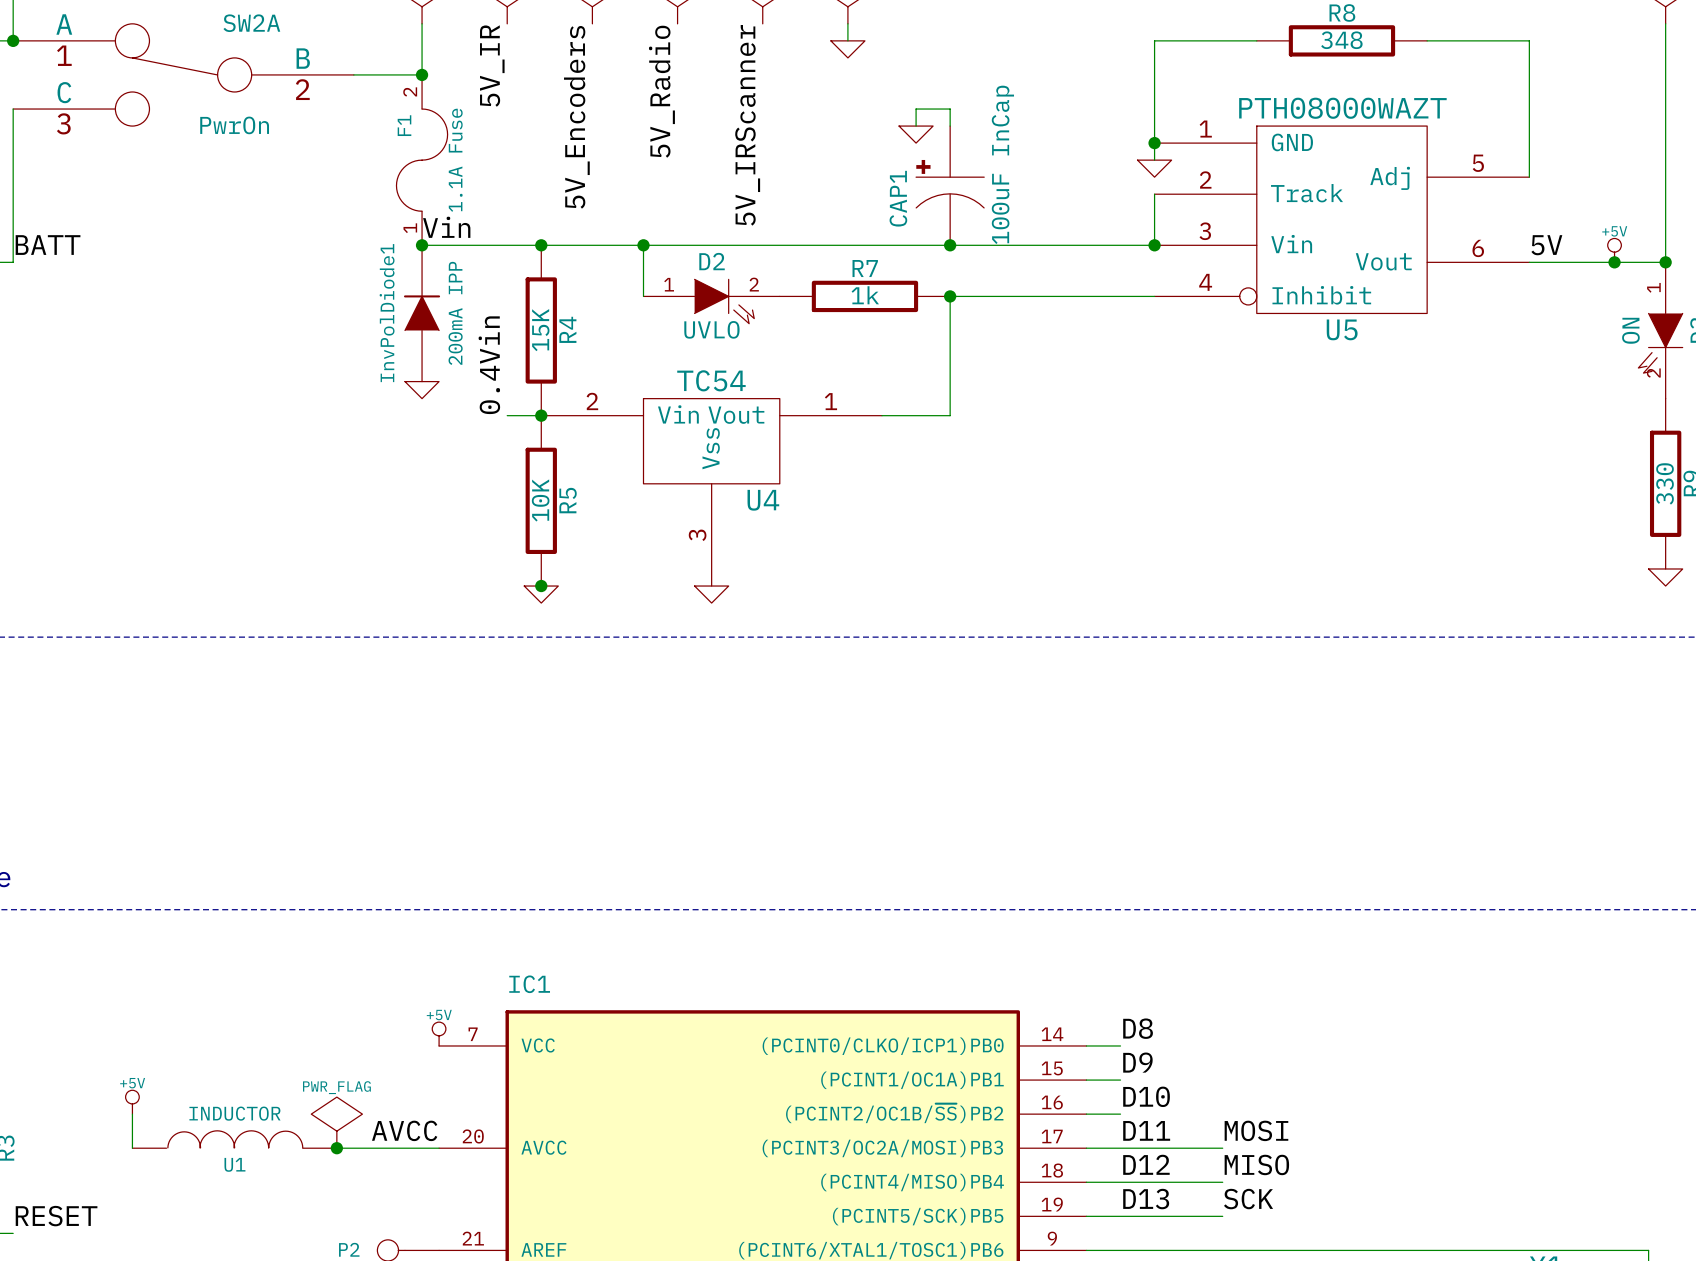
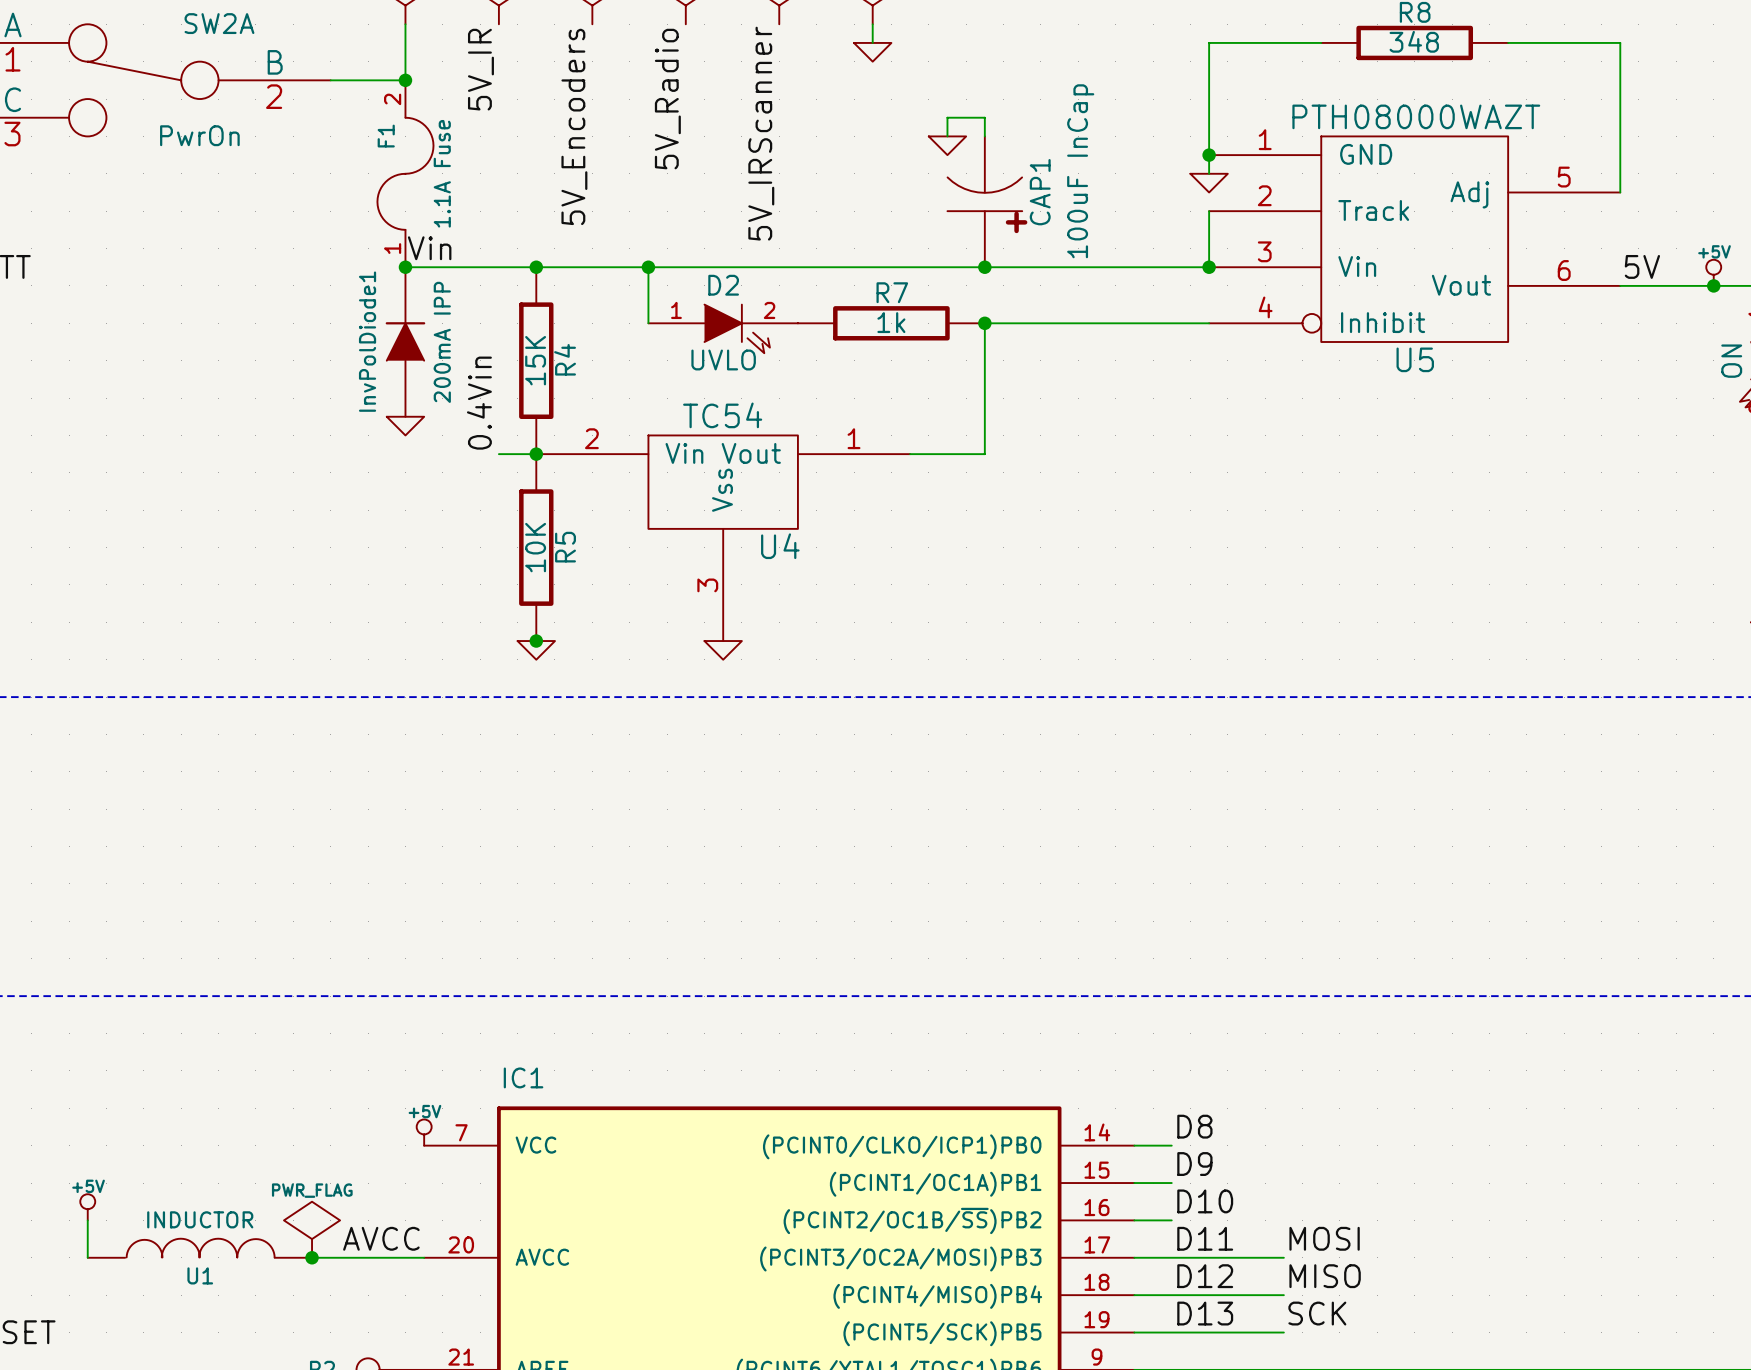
CAP1 value position: 100uF InCap (1002, 164) -> 100uF InCap (1080, 171)
CAP1 rotation: 0° (950, 192) -> 180° (984, 194)

